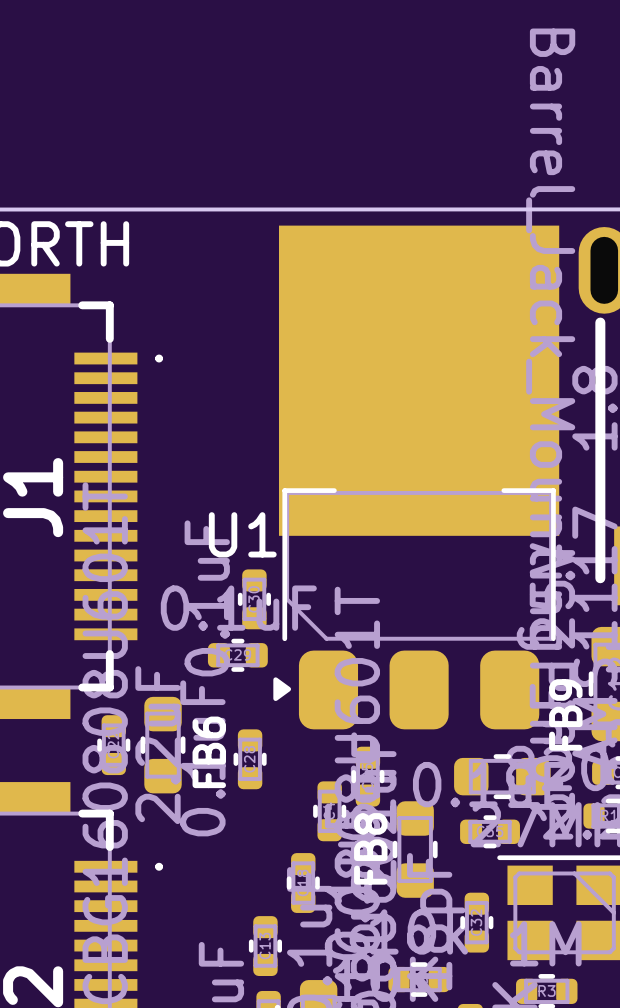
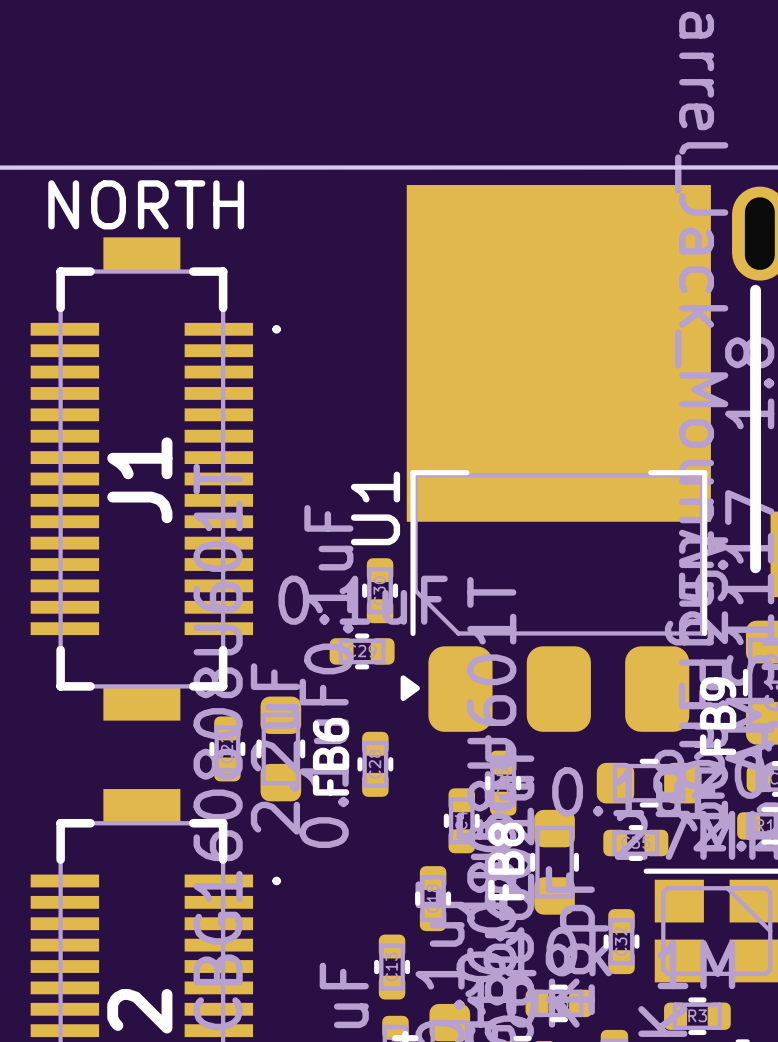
U1 name rotation: 0° (242, 534) -> 90° counterclockwise (375, 508)

